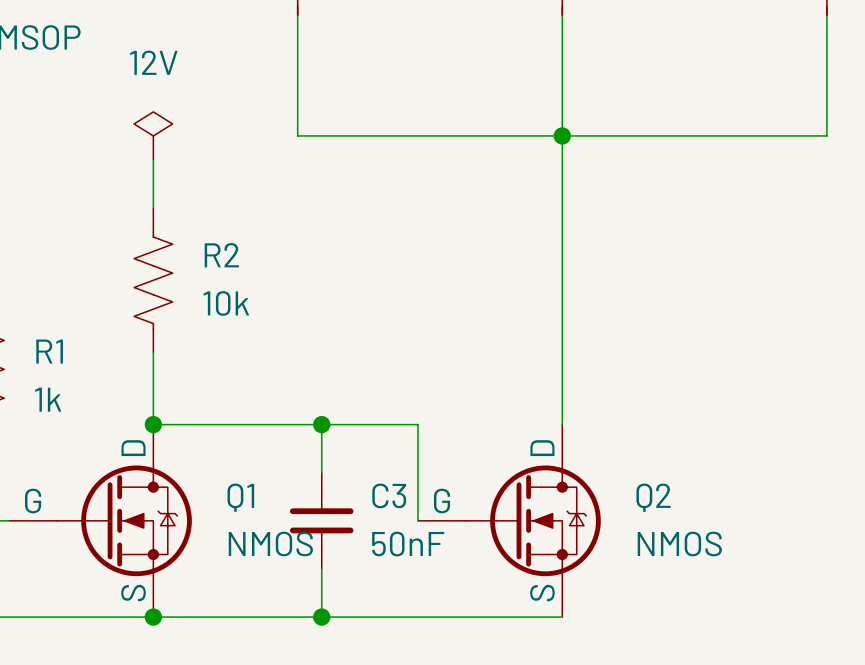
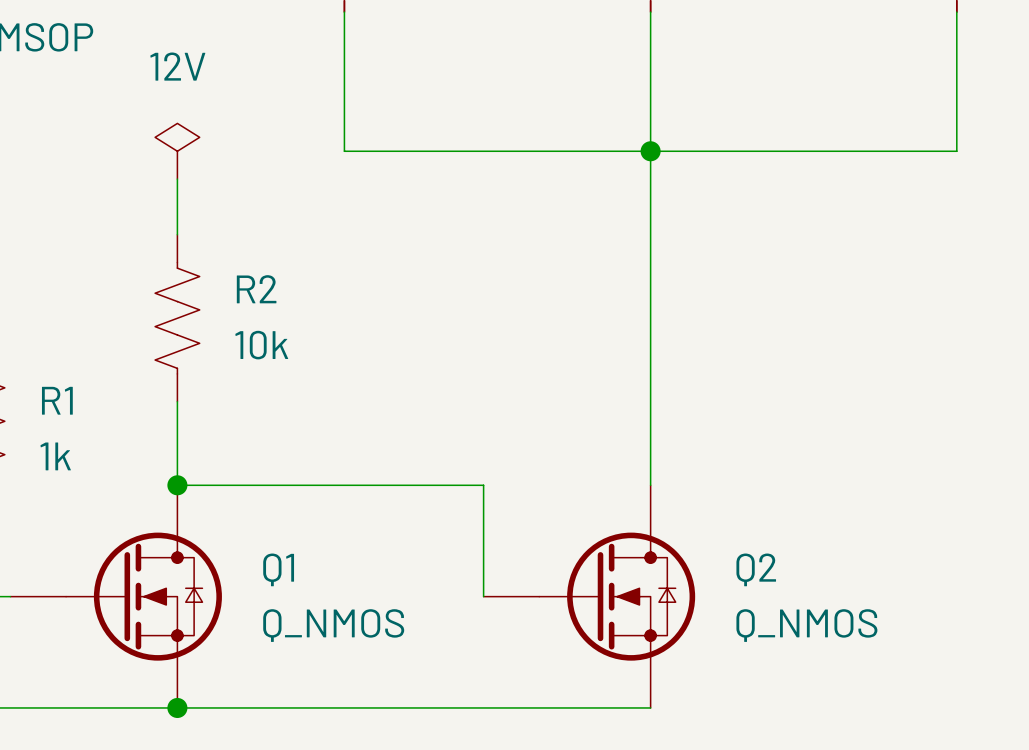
Q1 symbol: [9, 424, 192, 618] -> [10, 485, 222, 708]
wire: (321, 424) (321, 472) -> none
junction: (321, 424) -> none
Q2 symbol: [417, 424, 601, 618] -> [483, 485, 696, 708]
C3: 50nF (321, 520) -> none
Q1 value: NMOS (270, 543) -> Q_NMOS (333, 625)
Q2 value: NMOS (679, 543) -> Q_NMOS (806, 625)
wire: (321, 568) (321, 617) -> none
junction: (321, 617) -> none

